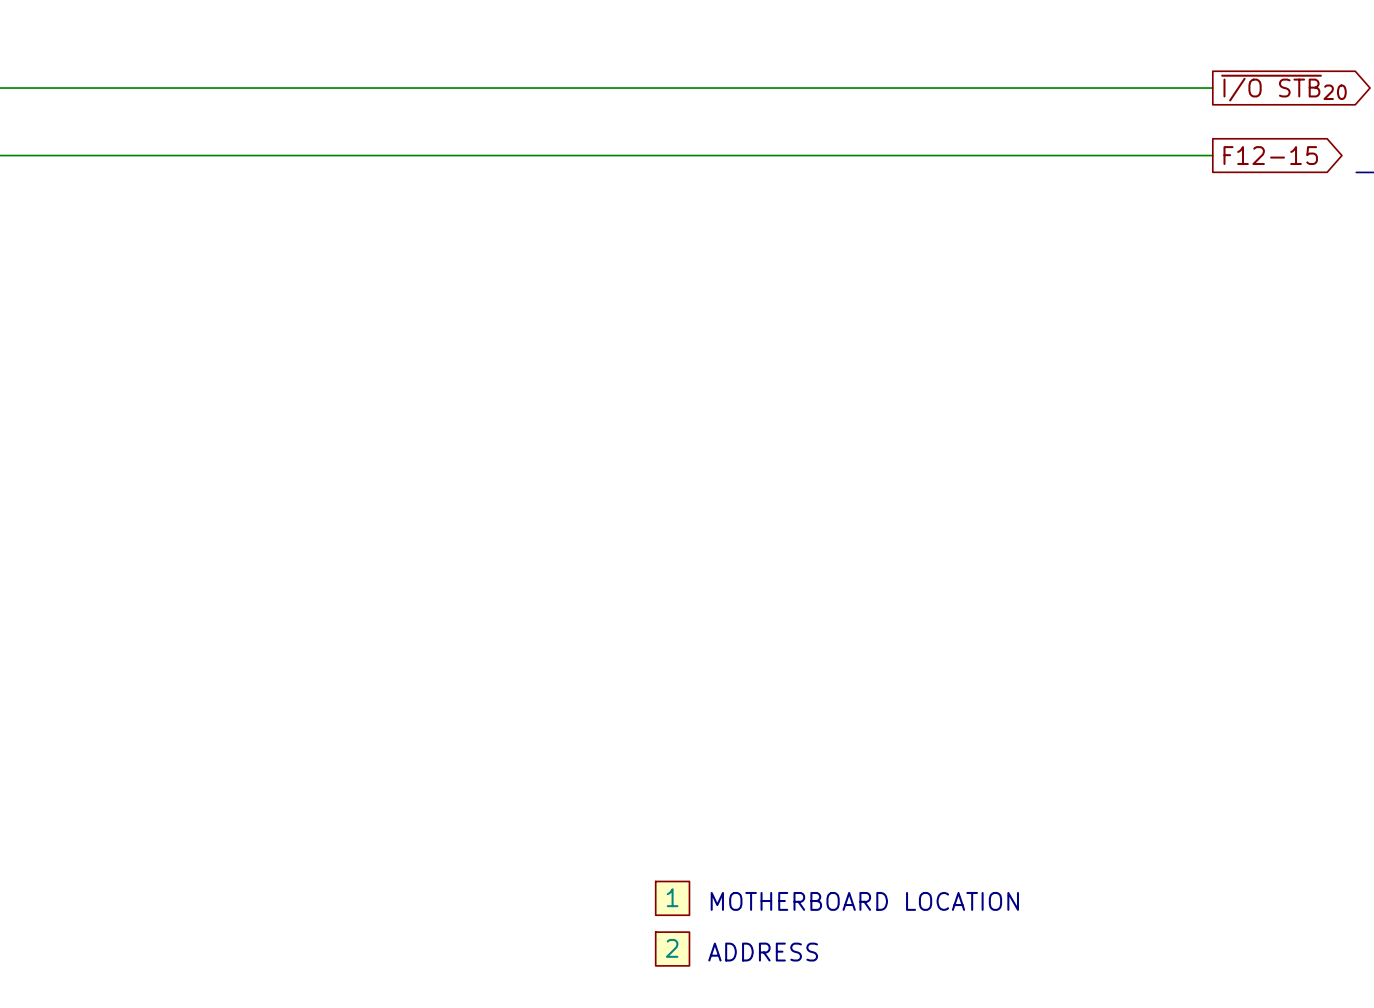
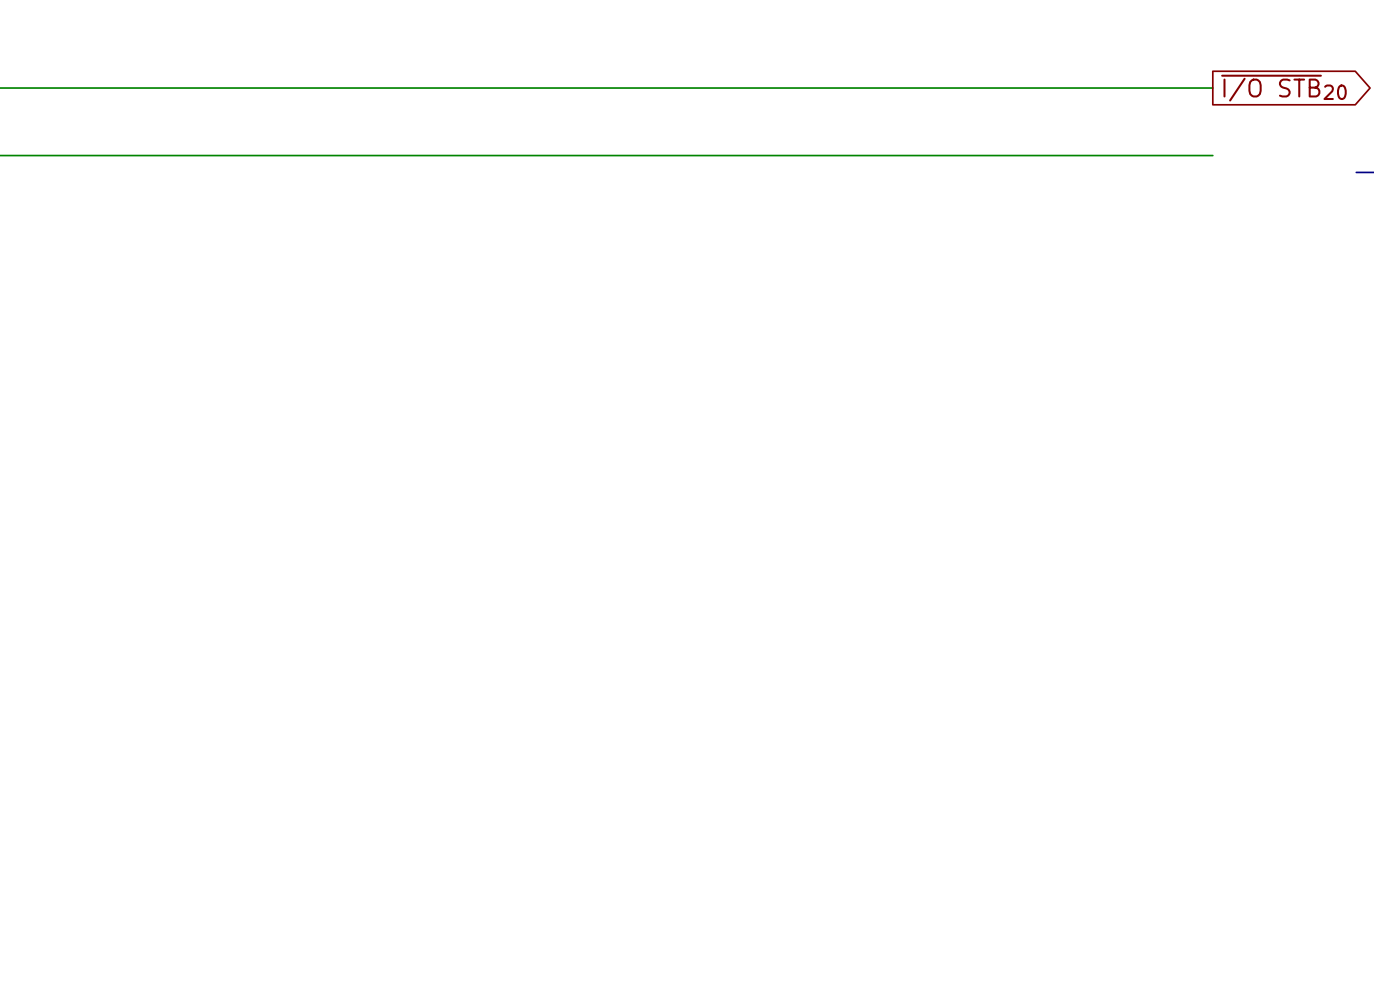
global label: F12-15 (1270, 155) -> none
part: 1 (672, 898) -> none
text: MOTHERBOARD LOCATION (864, 901) -> none
part: 2 (672, 949) -> none
text: ADDRESS (763, 952) -> none

